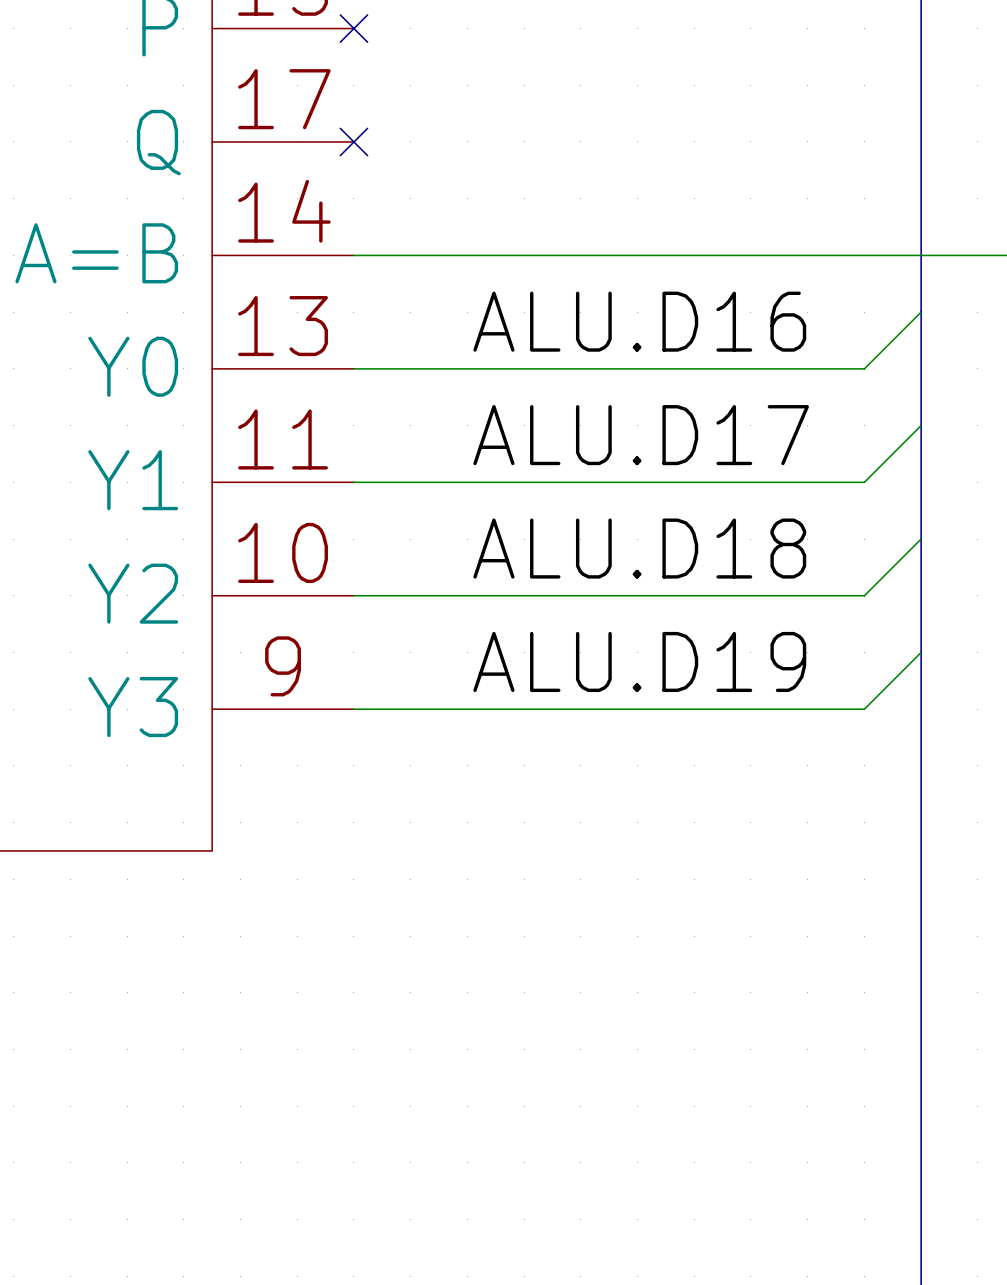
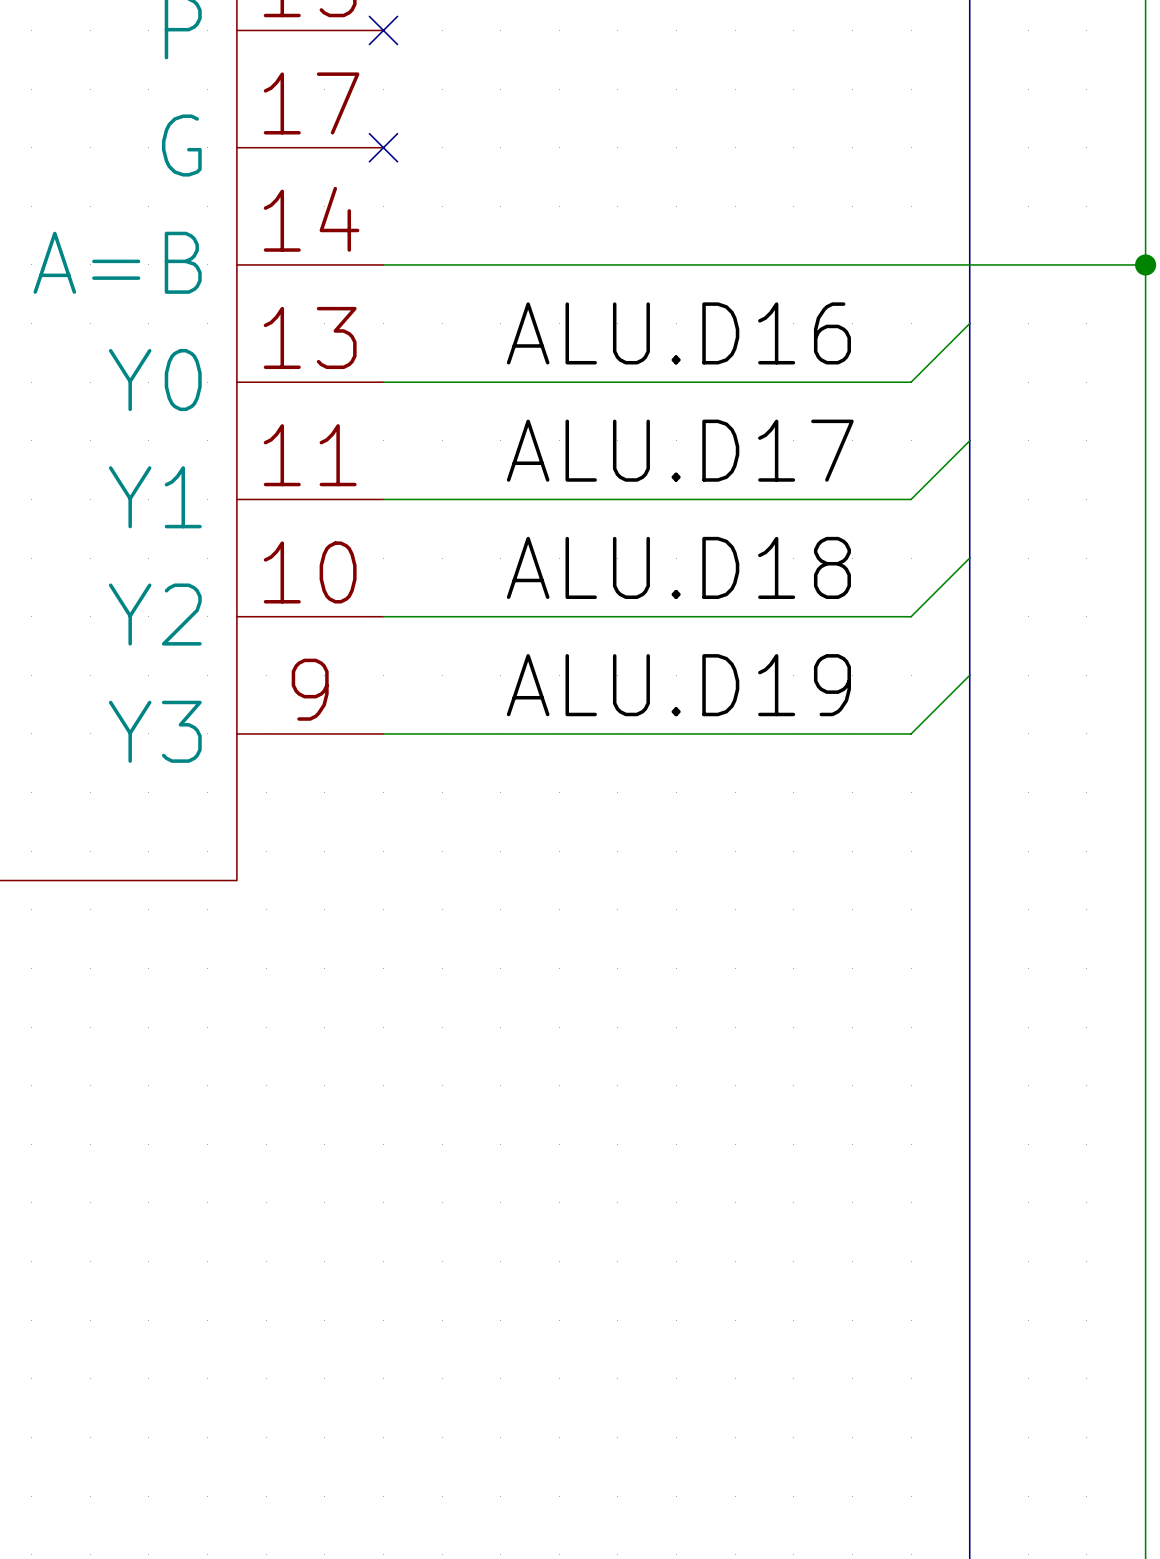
part pin name: Q (158, 142) -> G (181, 145)

